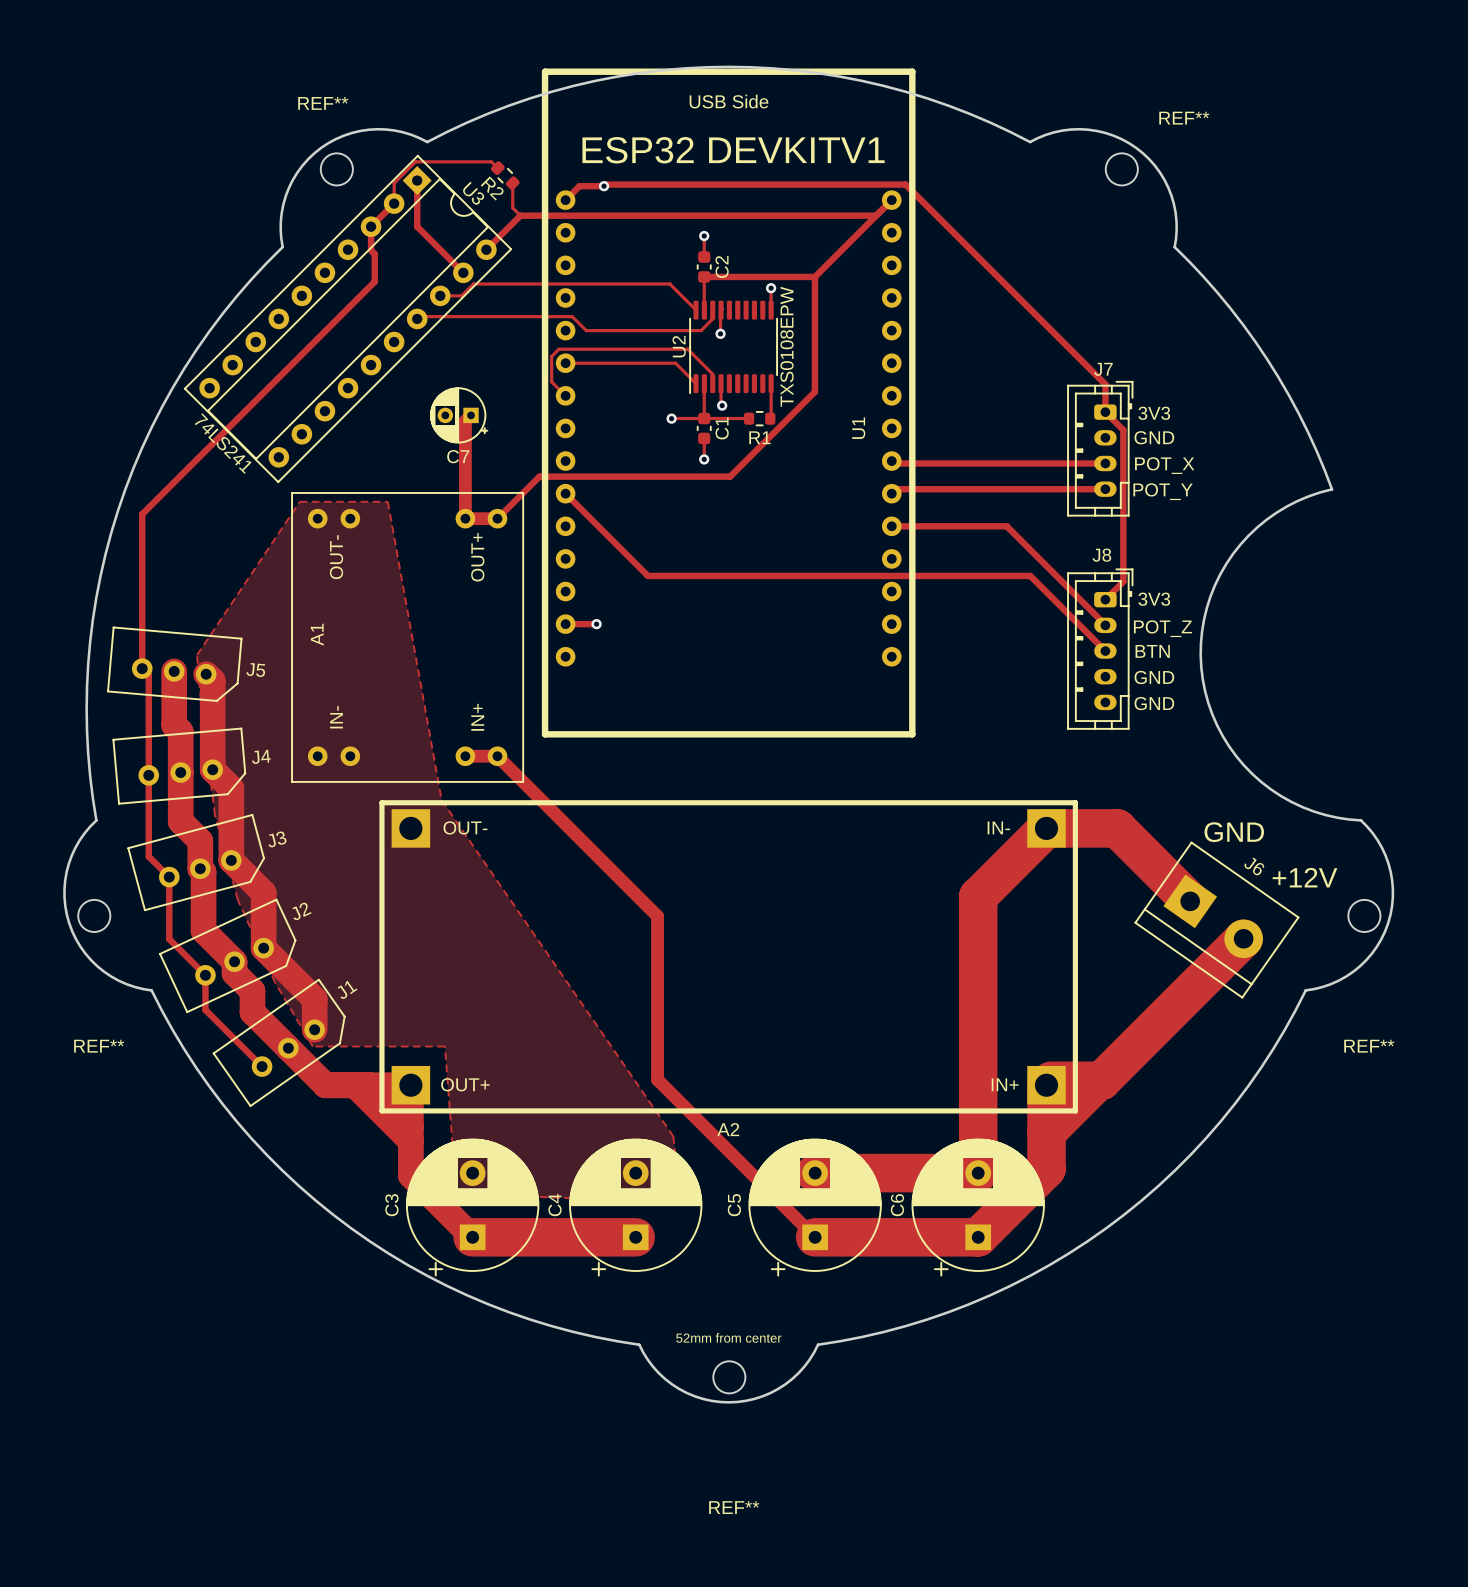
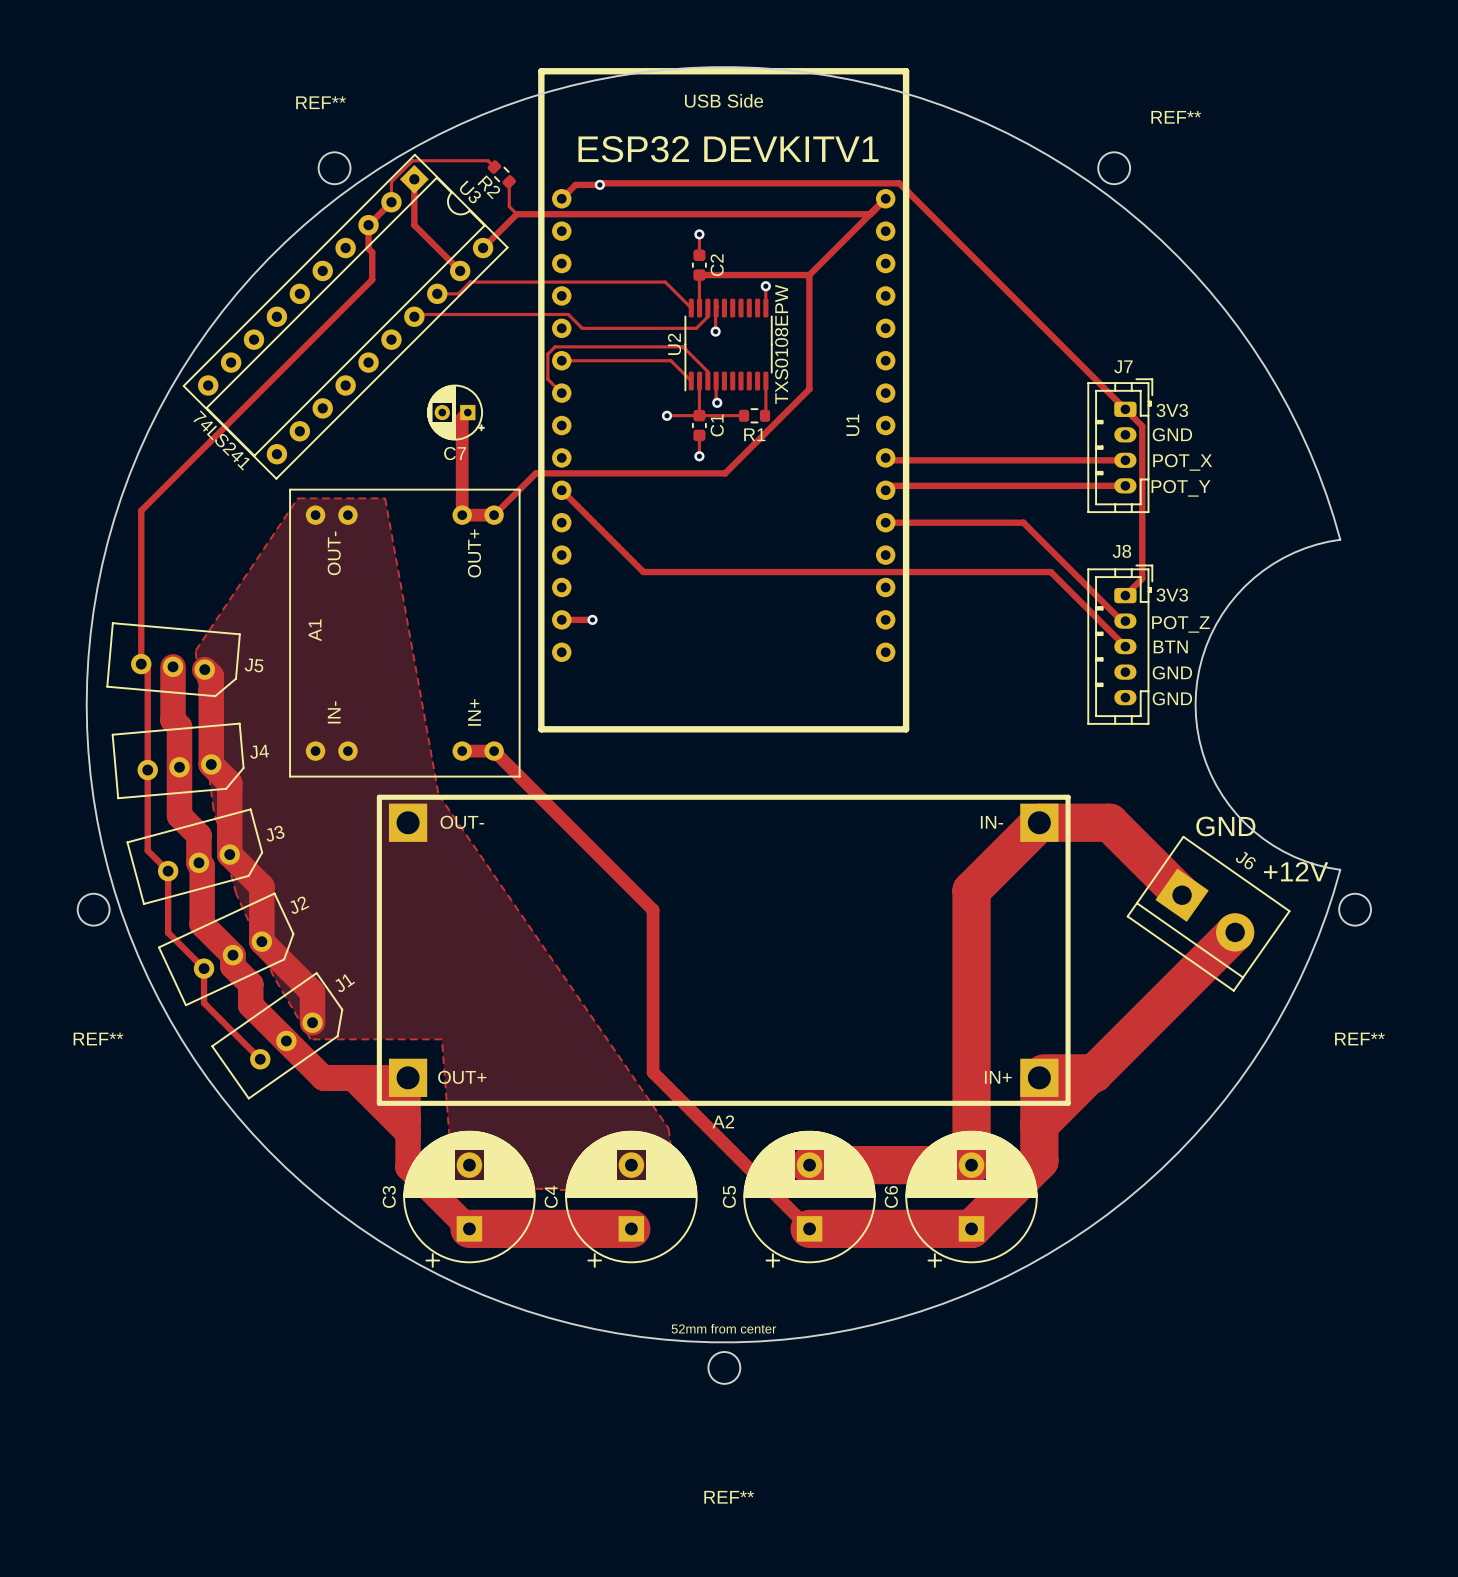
track: (1105, 384) (1105, 412) (1123, 430) (1123, 581) (1105, 599) -> (1097, 381) (1142, 426) (1142, 578) (1125, 595)
text position: 3V3 (1154, 413) -> 3V3 (1172, 410)
text position: GND (1154, 437) -> GND (1172, 434)
J7 position: (1100, 448) -> (1120, 445)
track: none -> (1097, 460) (1125, 460)
text position: POT_X (1164, 465) -> POT_X (1182, 462)
track: none -> (1097, 485) (1125, 485)
text position: POT_Y (1163, 491) -> POT_Y (1181, 488)
track: (1006, 526) (1105, 625) -> (999, 522) (1023, 522) (1121, 621) (1125, 621) (1118, 621)
track: (1030, 575) (1105, 651) -> (1023, 572) (1050, 572) (1125, 646)
text position: 3V3 (1154, 599) -> 3V3 (1172, 595)
text position: POT_Z (1162, 628) -> POT_Z (1180, 624)
J8 position: (1100, 649) -> (1120, 644)
text position: BTN (1152, 651) -> BTN (1170, 646)
text: GND (1154, 677) -> none
text: none -> GND (1172, 672)
text: GND (1154, 703) -> none
text: none -> GND (1172, 698)
board edge: (1361, 820) (1337, 817) (1313, 811) (1291, 802) (1261, 782) (1244, 765) (1229, 746) (1217, 725) (1208, 703) (1201, 667) (1202, 631) (1210, 596) (1226, 563) (1248, 535) (1276, 512) (1308, 496) (1332, 489) (1298, 413) (1267, 359) (1230, 308) (1174, 247) (1176, 221) (1171, 195) (1164, 180) (1149, 159) (1136, 147) (1121, 139) (1096, 130) (1079, 129) (1062, 130) (1045, 134) (1030, 142) (989, 122) (948, 105) (905, 91) (862, 80) (818, 73) (773, 68) (728, 66) (683, 68) (617, 76) (551, 91) (488, 113) (427, 142) (411, 134) (394, 130) (377, 129) (352, 132) (328, 143) (314, 153) (302, 165) (288, 187) (283, 204) (280, 229) (282, 247) (236, 296) (209, 331) (184, 368) (151, 427) (133, 468) (118, 510) (105, 553) (96, 597) (88, 664) (87, 731) (90, 776) (96, 820) (79, 840) (71, 855) (66, 872) (64, 897) (66, 914) (72, 931) (80, 946) (91, 960) (103, 971) (118, 980) (134, 986) (151, 990) (184, 1049) (209, 1086) (236, 1121) (282, 1170) (315, 1200) (351, 1228) (407, 1264) (467, 1295) (509, 1312) (551, 1326) (595, 1336) (639, 1344) (647, 1359) (658, 1373) (679, 1388) (703, 1398) (720, 1401) (737, 1401) (762, 1396) (785, 1384) (804, 1366) (818, 1344) (884, 1331) (927, 1319) (989, 1295) (1030, 1275) (1087, 1241) (1123, 1214) (1158, 1186) (1205, 1138) (1248, 1086) (1284, 1029) (1305, 990) (1330, 984) (1353, 971) (1366, 960) (1381, 939) (1388, 923) (1392, 906) (1392, 880) (1388, 863) (1381, 847) (1372, 833) (1361, 820) -> (1340, 539) (1316, 544) (1283, 557) (1263, 570) (1245, 586) (1229, 604) (1210, 635) (1202, 657) (1197, 680) (1196, 716) (1199, 740) (1210, 774) (1229, 805) (1253, 831) (1273, 845) (1305, 861) (1340, 869) (1326, 914) (1309, 958) (1277, 1021) (1239, 1080) (1210, 1117) (1178, 1152) (1125, 1200) (1068, 1241) (1028, 1265) (964, 1295) (897, 1318) (828, 1333) (782, 1339) (735, 1342) (664, 1339) (594, 1329) (549, 1317) (482, 1294) (418, 1264) (378, 1240) (321, 1198) (268, 1151) (222, 1098) (182, 1040) (148, 978) (129, 934) (107, 867) (93, 798) (88, 751) (86, 704) (90, 634) (102, 564) (121, 496) (148, 431) (170, 389) (208, 330) (237, 293) (268, 258) (321, 210) (358, 182) (418, 145) (482, 114) (549, 91) (617, 76) (688, 68) (758, 68) (805, 72) (874, 85) (920, 97) (986, 123) (1048, 155) (1107, 194) (1161, 240) (1210, 291) (1239, 328) (1277, 387) (1299, 429) (1318, 472) (1340, 539)

